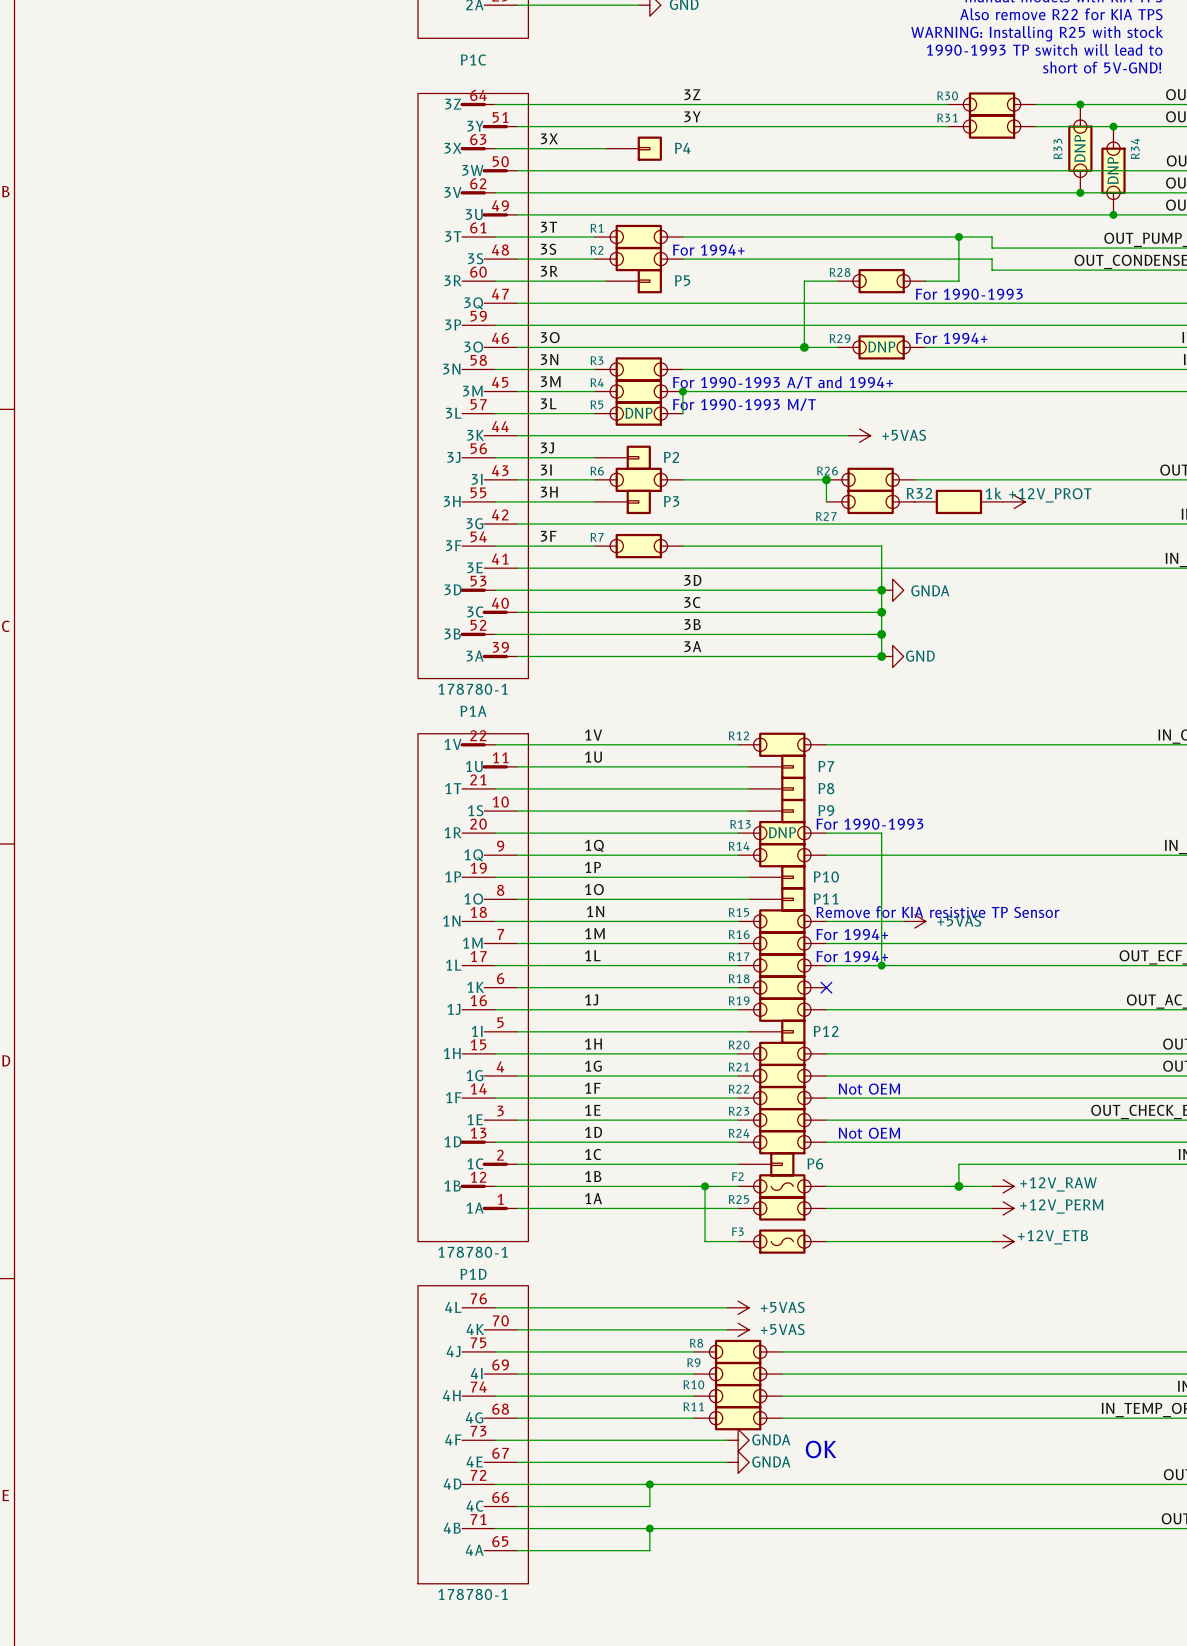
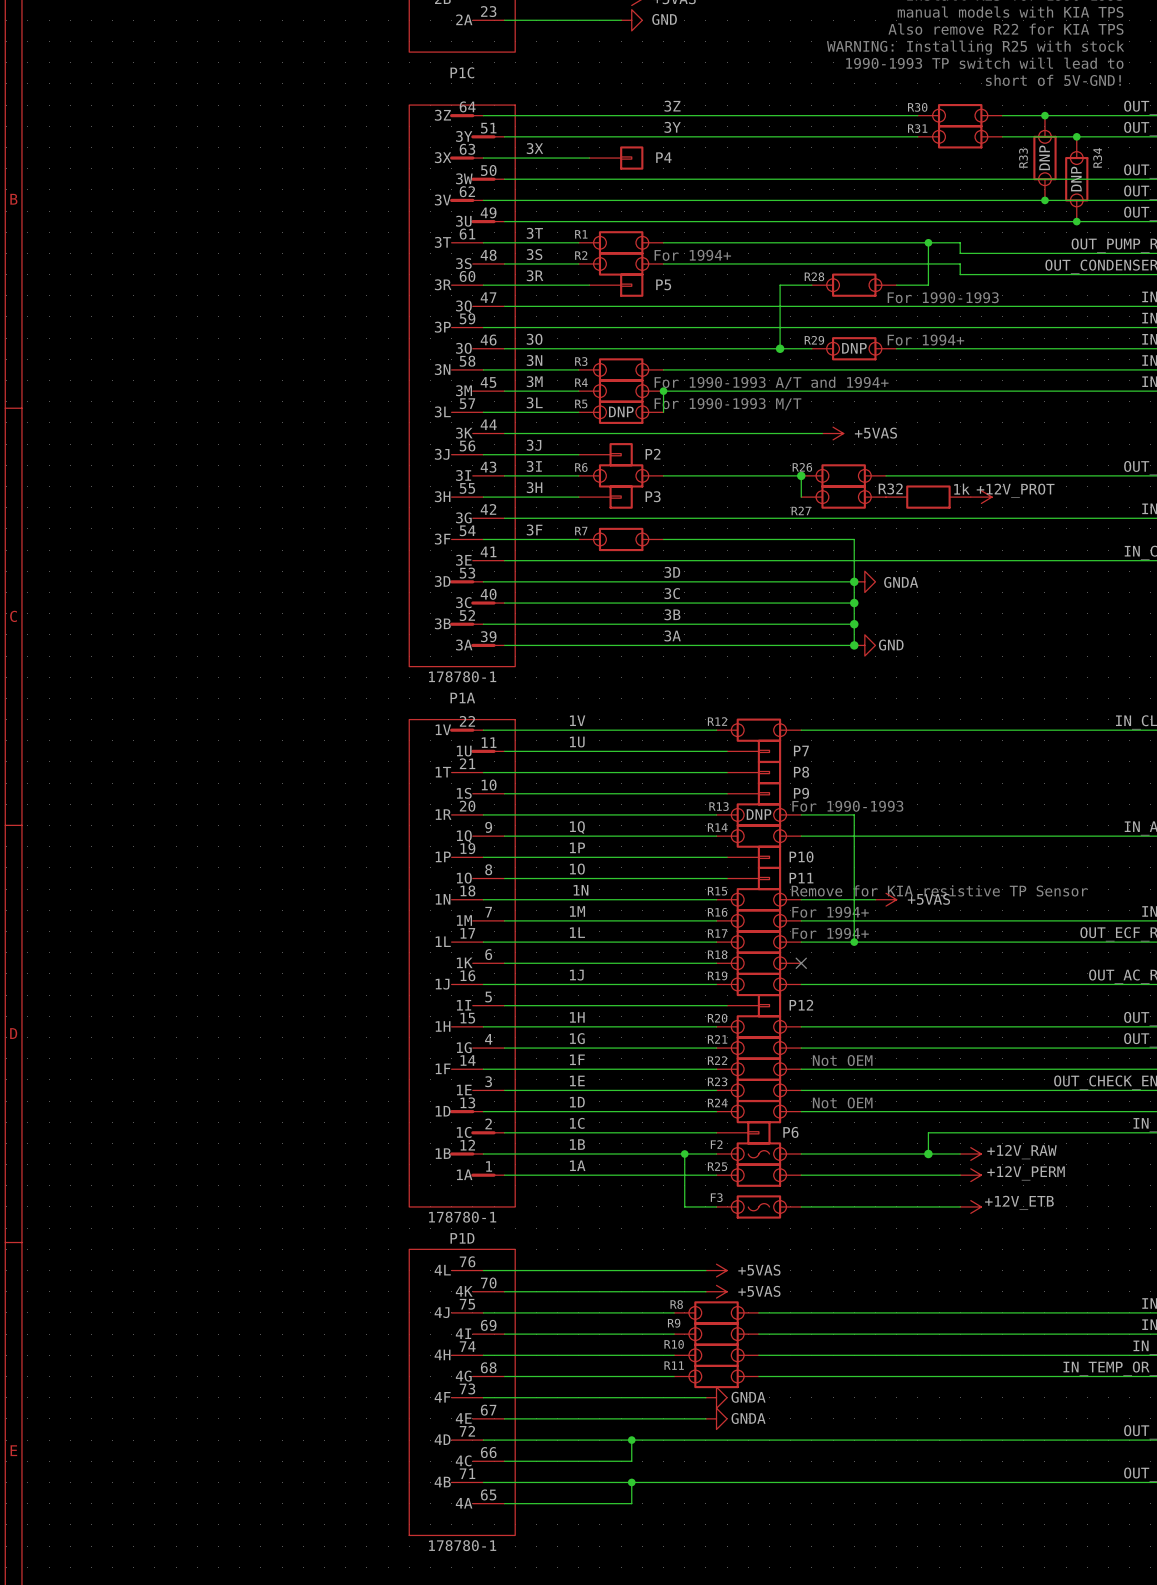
text: OK (821, 1449) -> none

